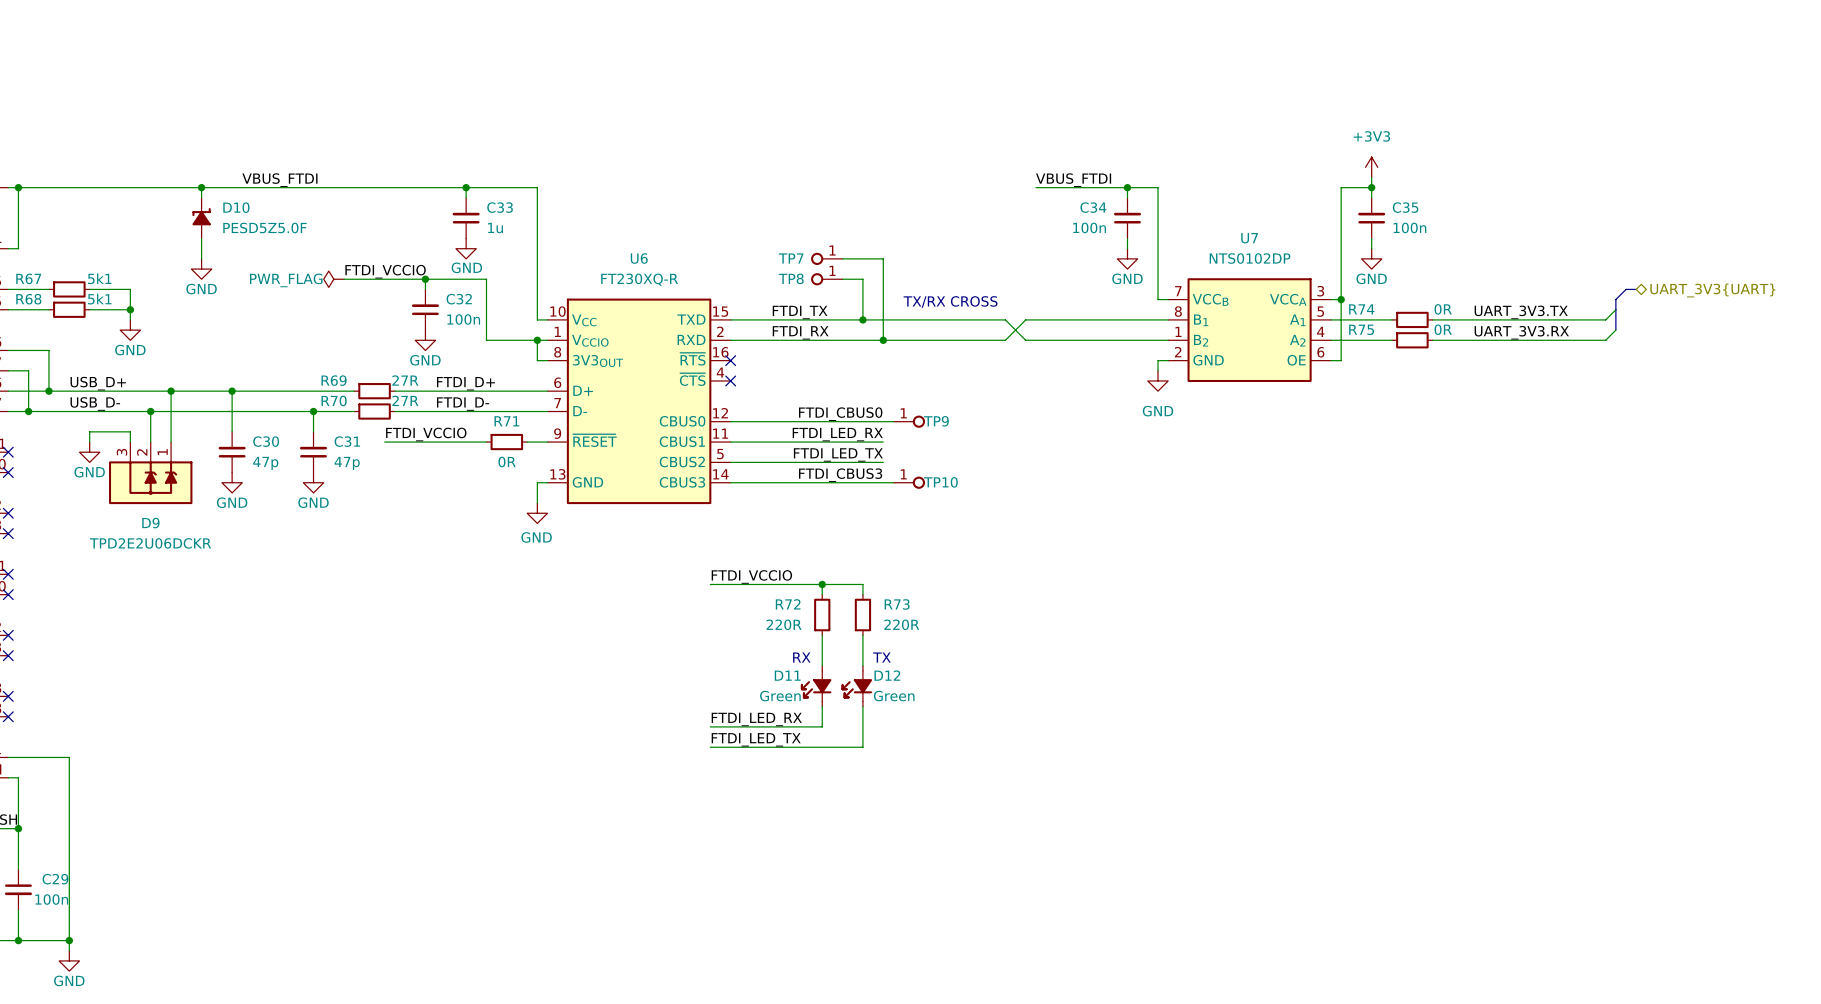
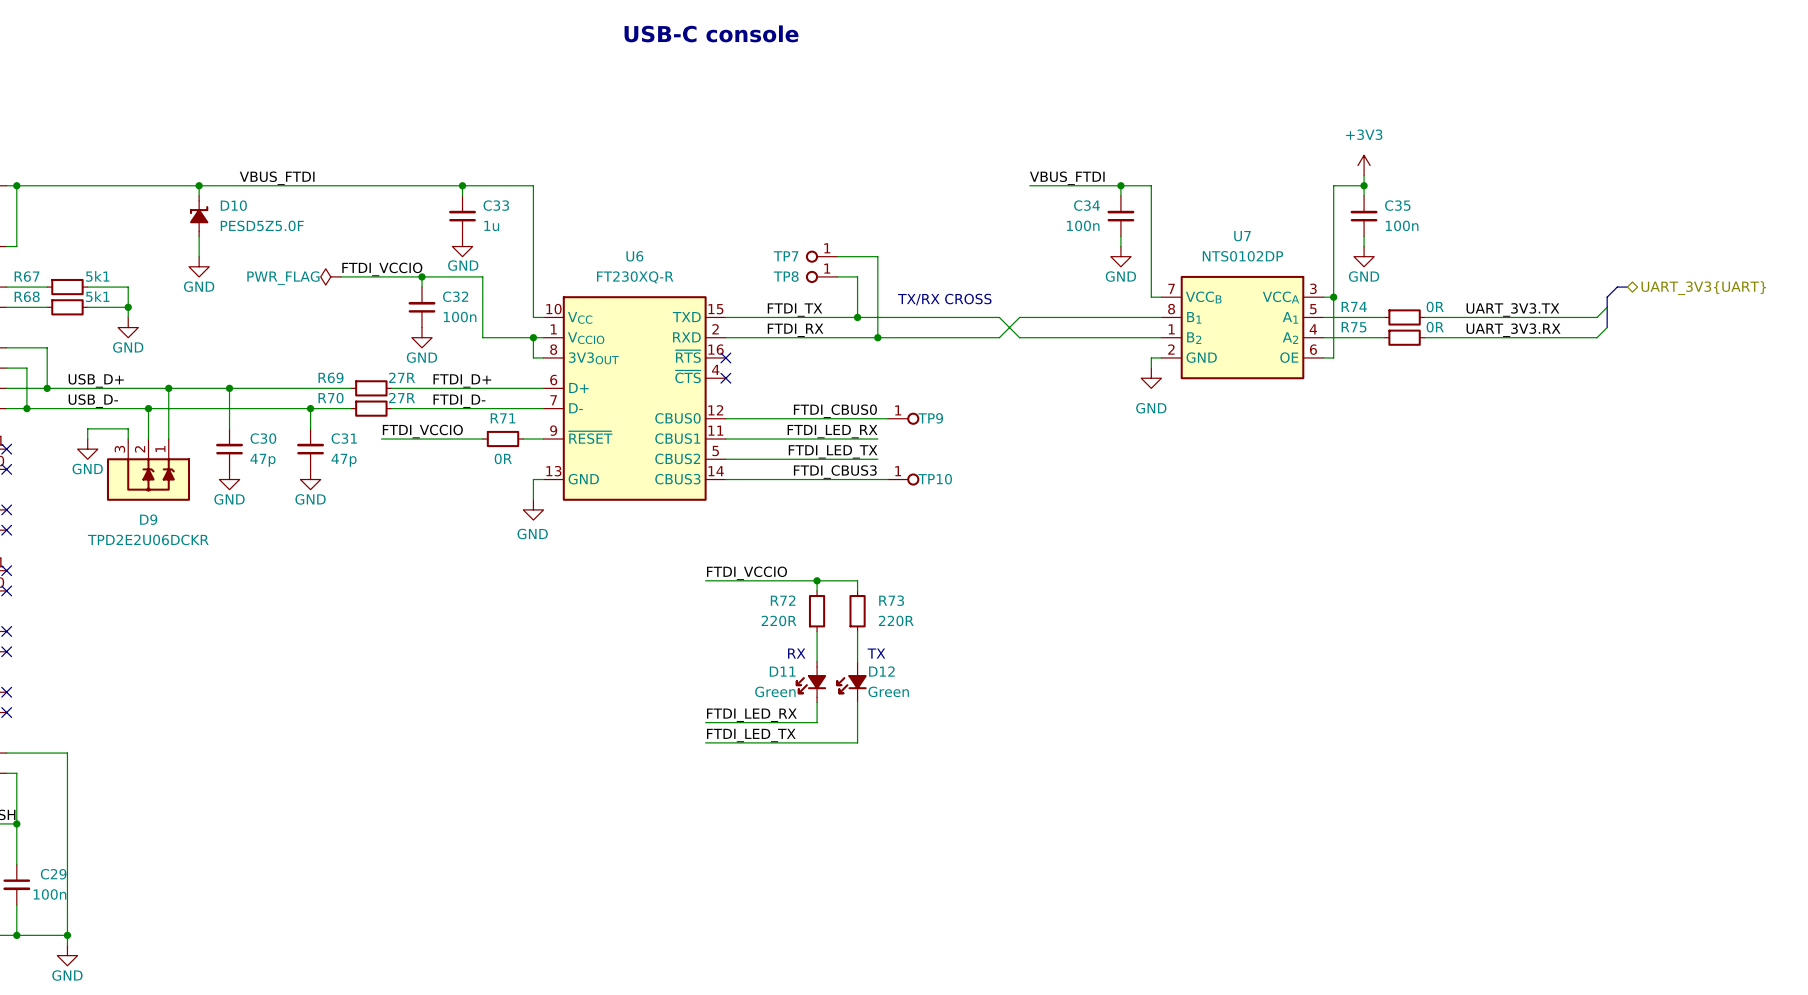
text: none -> USB-C console (711, 33)

